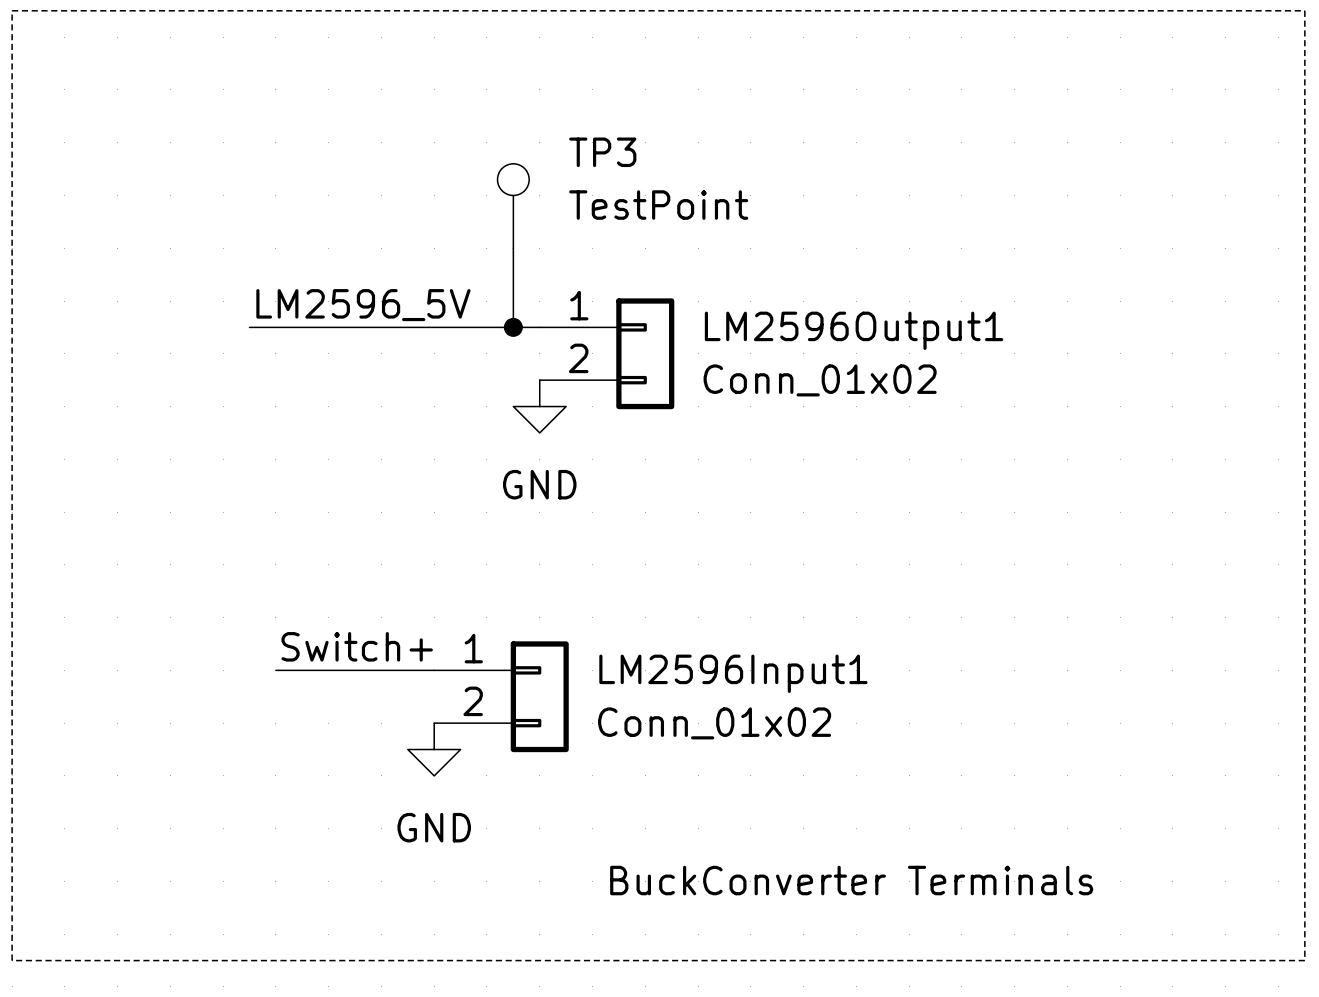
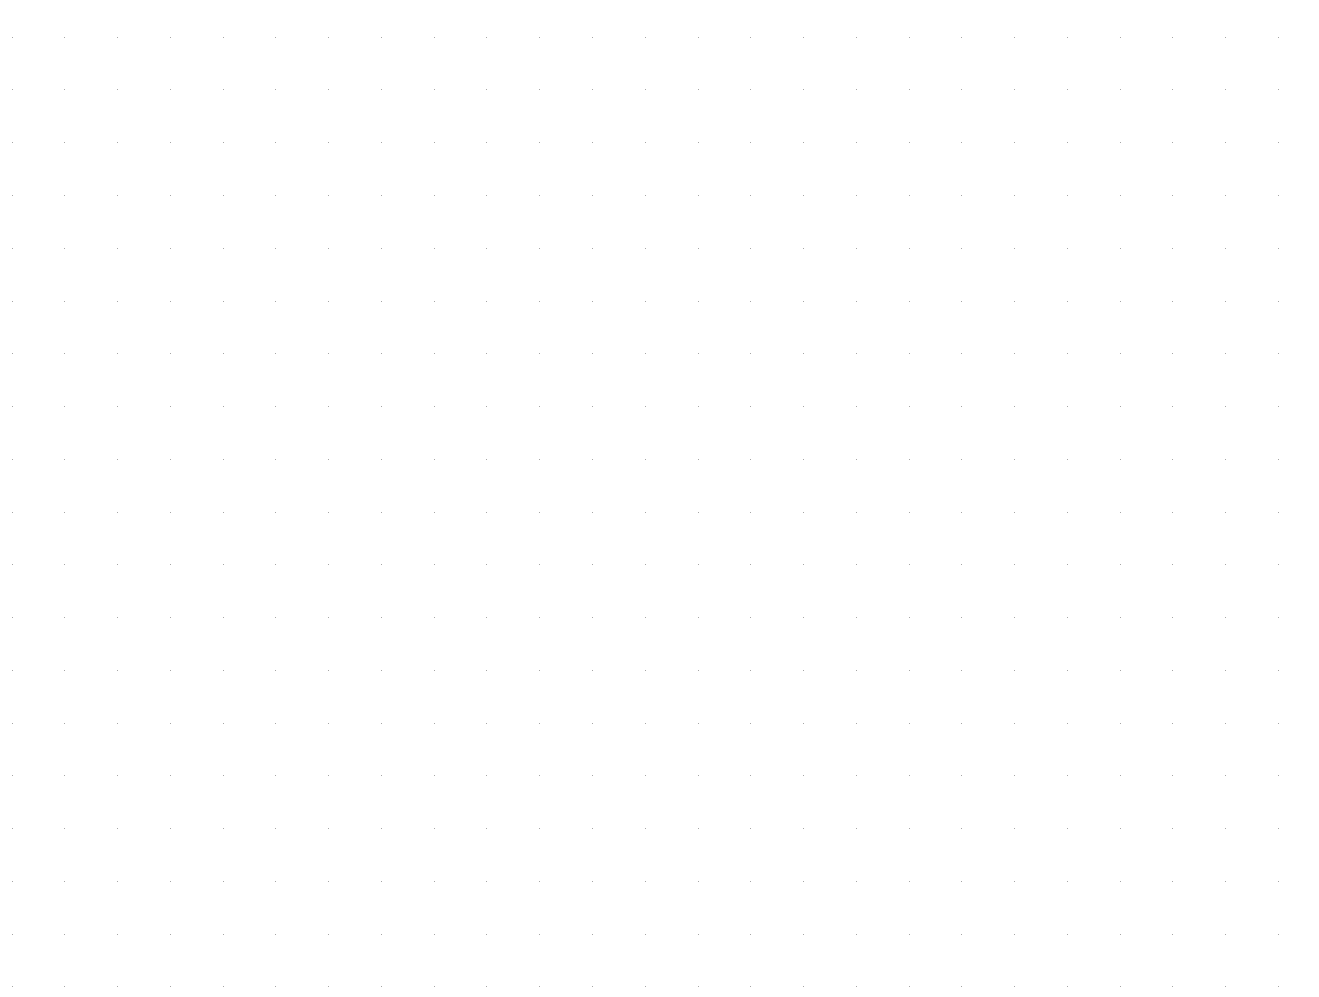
line: (12, 10) (1304, 10) (1304, 960) (12, 960) (12, 10) -> none
TP3: TestPoint (513, 206) -> none
wire: (513, 248) (513, 327) -> none
label: LM2596_5V (363, 305) -> none
wire: (249, 327) (539, 327) -> none
junction: (513, 327) -> none
LM2596Output1: Conn_01x02 (607, 353) -> none
power symbol: GND (539, 406) -> none
label: Switch+ (357, 646) -> none
wire: (275, 670) (434, 670) -> none
LM2596Input1: Conn_01x02 (501, 696) -> none
power symbol: GND (434, 749) -> none
text: BuckConverter Terminals (851, 880) -> none

